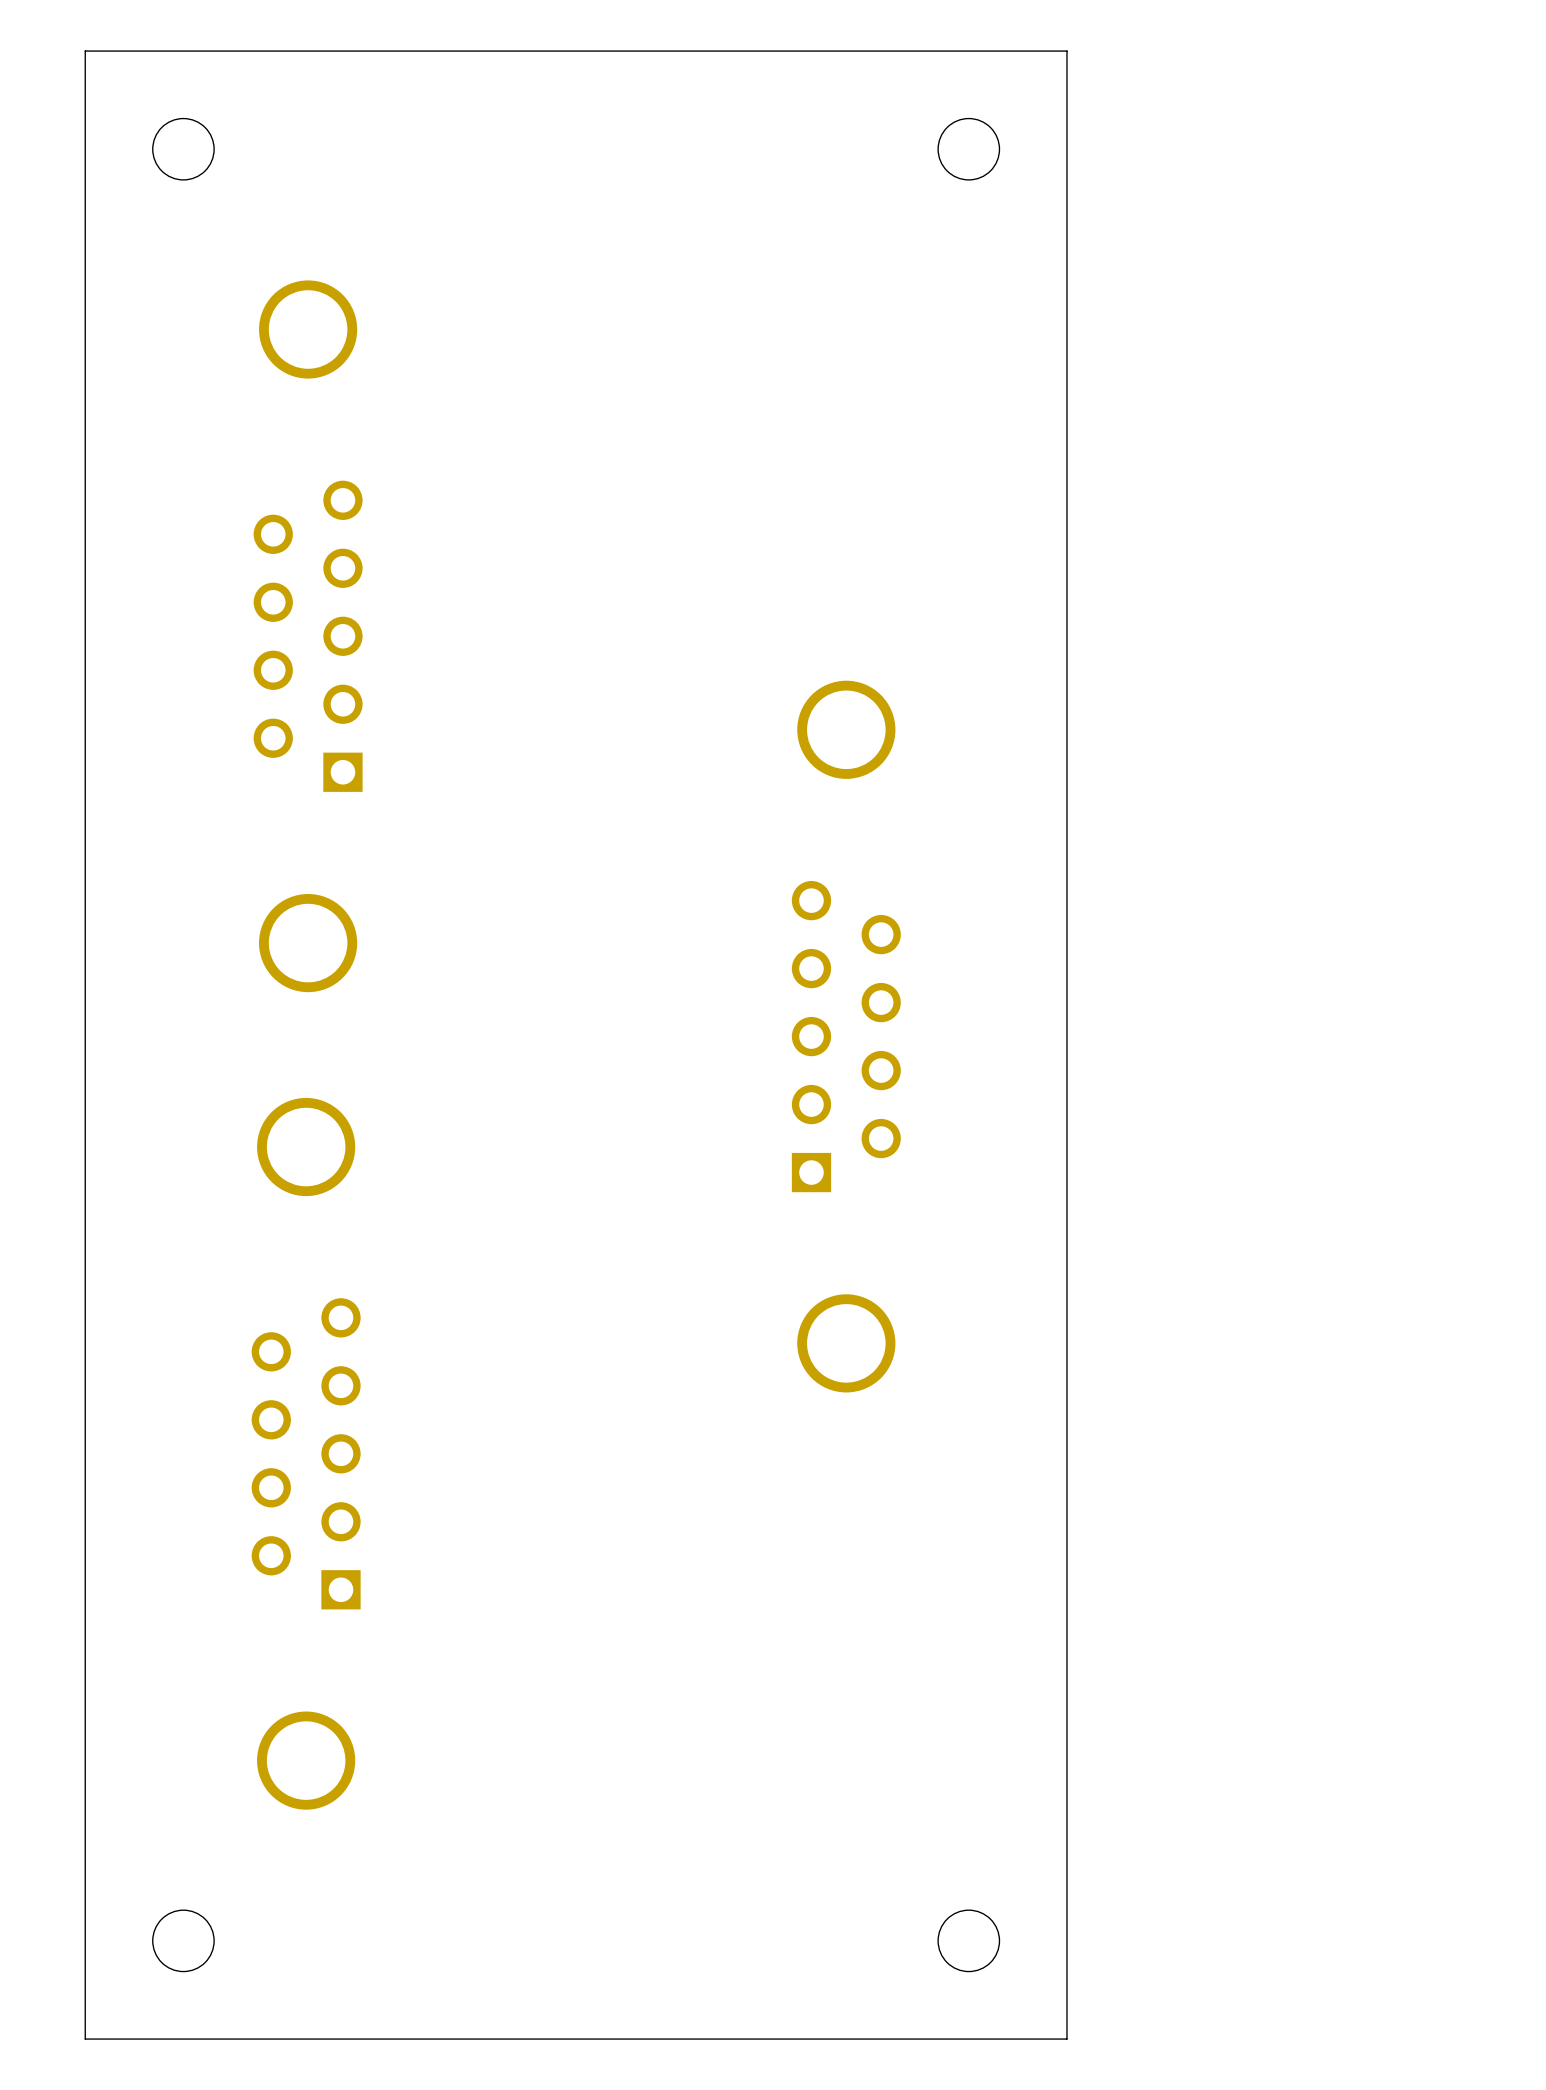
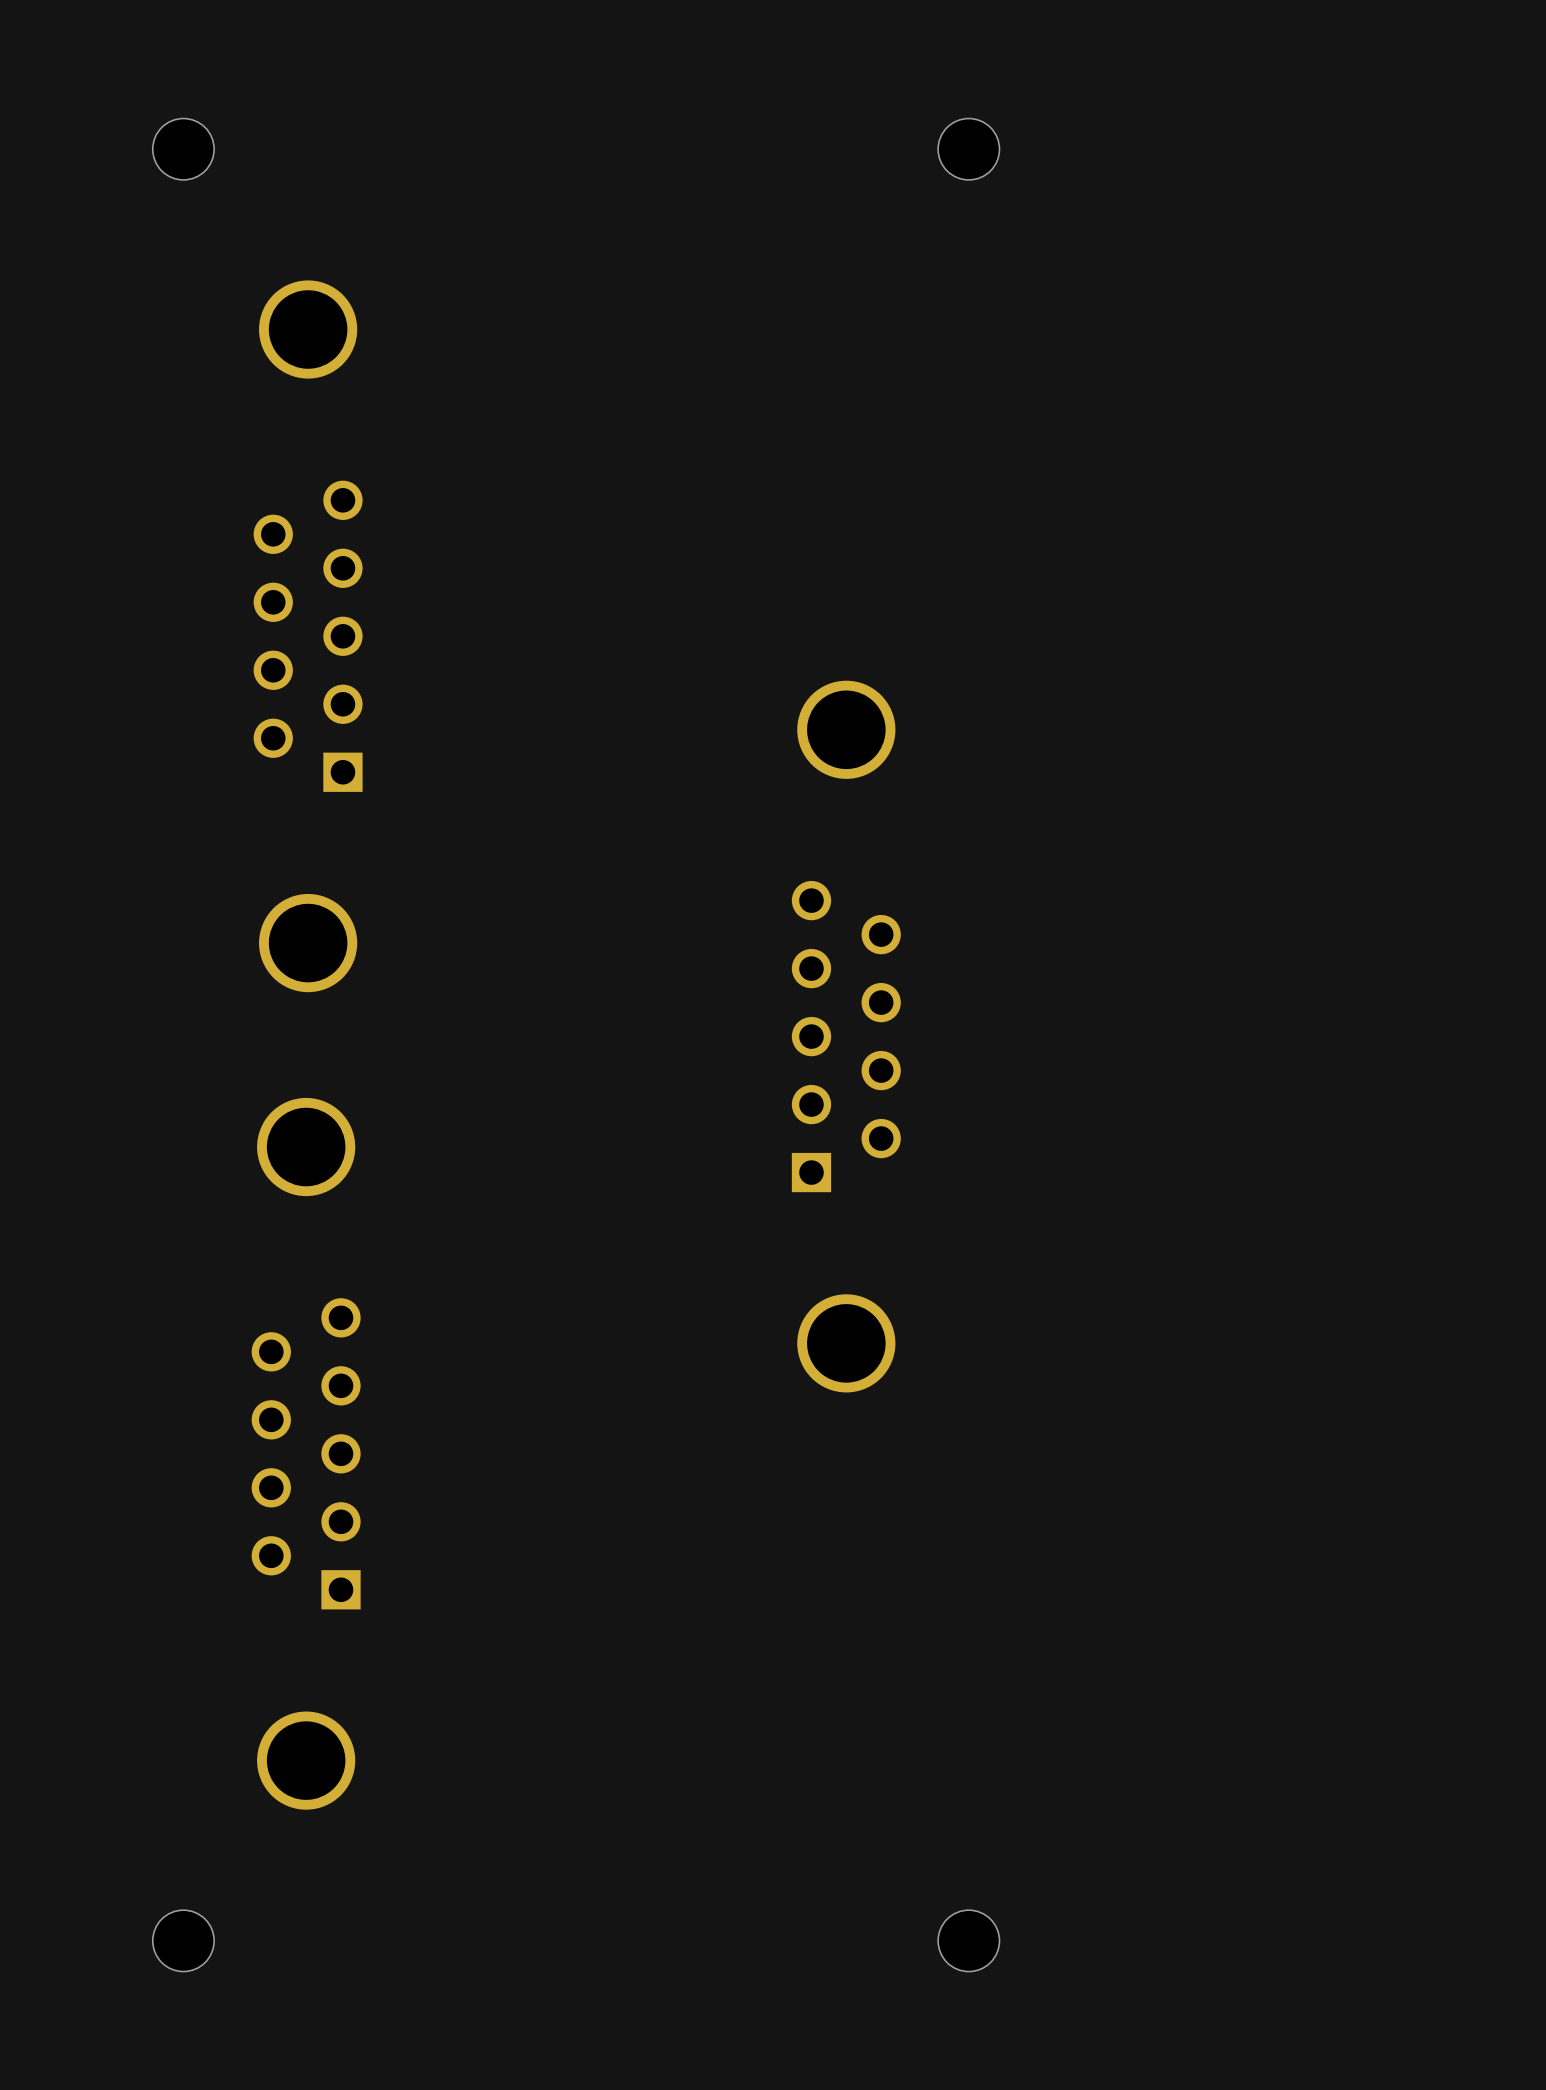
board edge: (1066, 51) (85, 51) (85, 2039) (1066, 2039) (1066, 51) -> none

